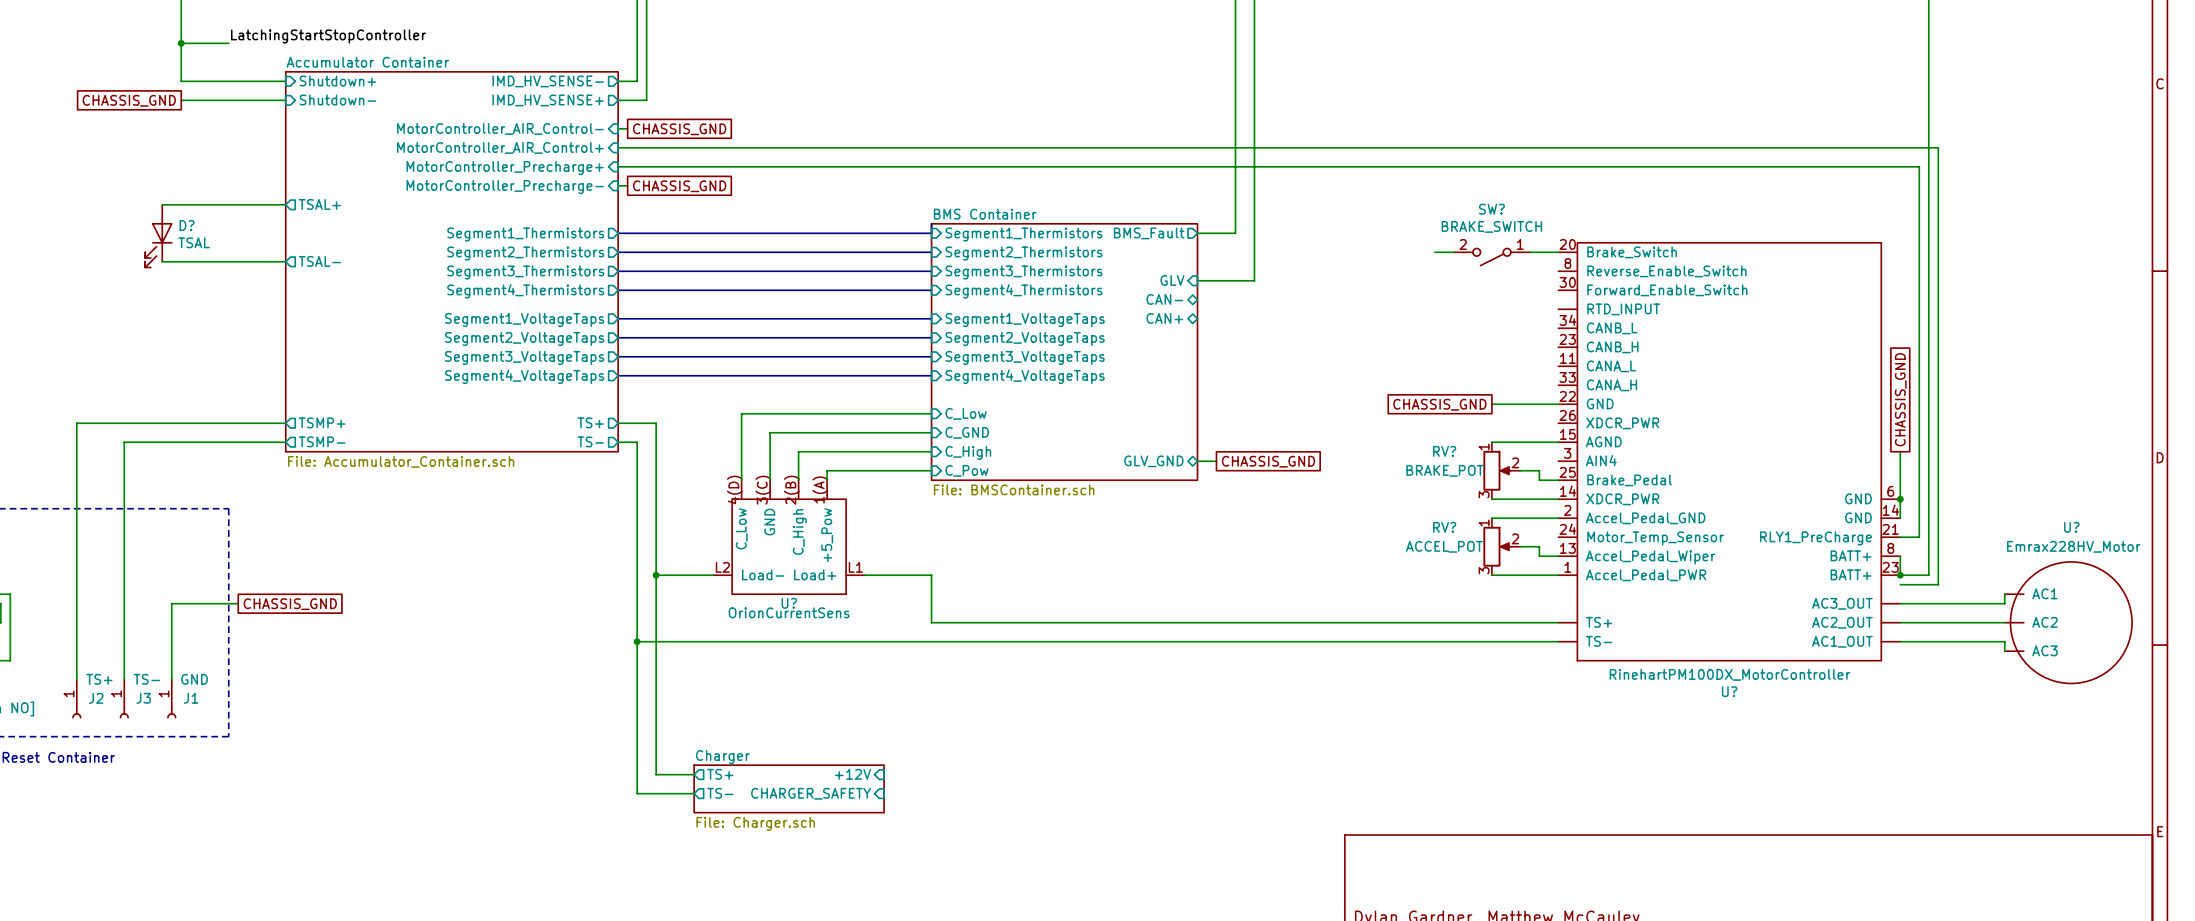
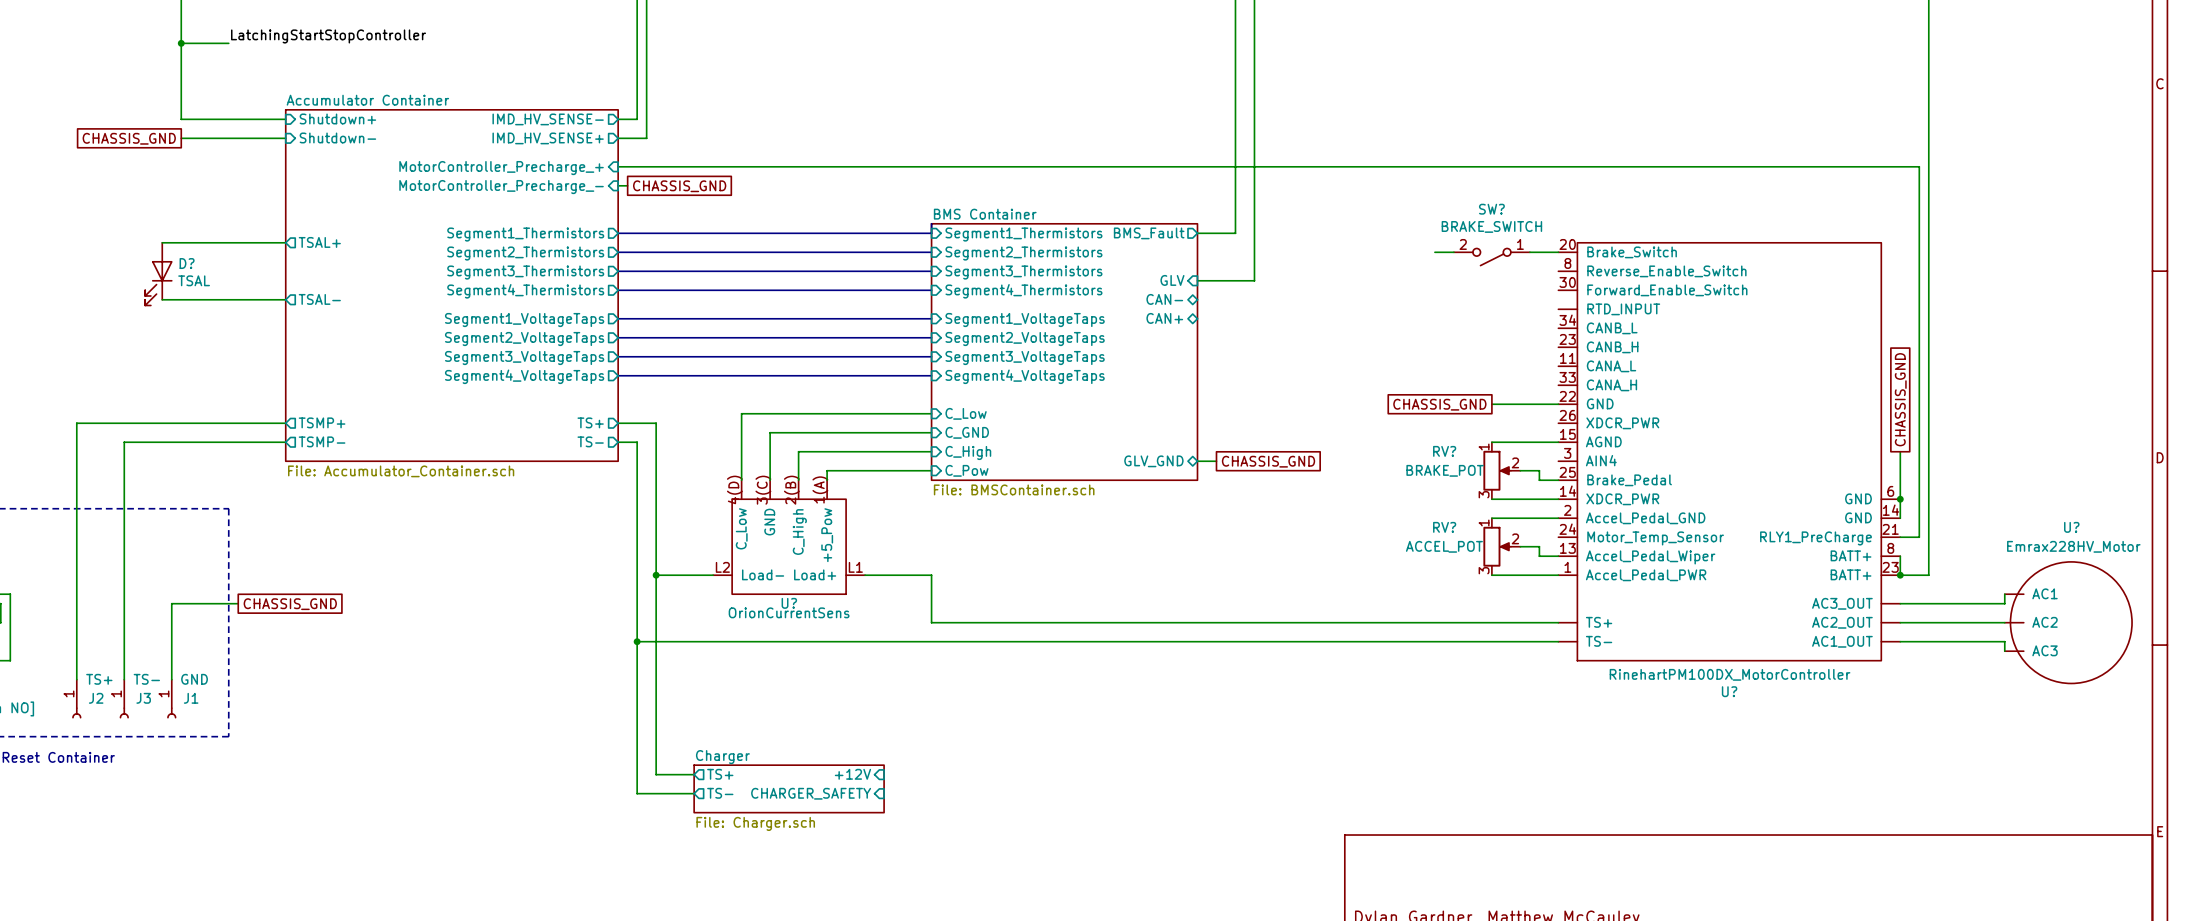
sheet pin position: Shutdown+ (337, 80) -> Shutdown+ (337, 118)
wire: (181, 81) (285, 81) -> (181, 81) (181, 119) (285, 119)
sheet pin position: IMD_HV_SENSE- (548, 81) -> IMD_HV_SENSE- (548, 119)
wire: (618, 81) (637, 81) -> (618, 119) (637, 119) (637, 81)
sheet pin position: Shutdown- (337, 99) -> Shutdown- (337, 137)
global label position: CHASSIS_GND (129, 100) -> CHASSIS_GND (129, 138)
wire: (181, 100) (285, 100) -> (181, 138) (285, 138)
sheet pin position: IMD_HV_SENSE+ (548, 100) -> IMD_HV_SENSE+ (548, 138)
wire: (618, 100) (646, 100) -> (618, 138) (646, 138) (646, 100)
sheet pin: MotorController_AIR_Control- (500, 128) -> none
wire: (618, 128) (627, 128) -> none
global label: CHASSIS_GND (679, 129) -> none
sheet pin: MotorController_AIR_Control+ (500, 147) -> none
wire: (618, 147) (1938, 147) (1938, 584) (1900, 584) -> none
sheet pin: MotorController_Precharge+ (505, 168) -> MotorController_Precharge_+ (501, 168)
sheet pin: MotorController_Precharge- (505, 187) -> MotorController_Precharge_- (501, 187)
wire: (162, 204) (285, 204) -> (162, 242) (285, 242)
sheet pin position: TSAL+ (319, 204) -> TSAL+ (319, 242)
D? position: (158, 236) -> (158, 274)
wire: (162, 261) (285, 261) -> (162, 299) (285, 299)
sheet pin position: TSAL- (319, 261) -> TSAL- (319, 299)
sheet Accumulator Container: File: Accumulator_Container.sch (451, 261) -> none
sheet Accumulator Container: none -> File: Accumulator_Container.sch (451, 285)

